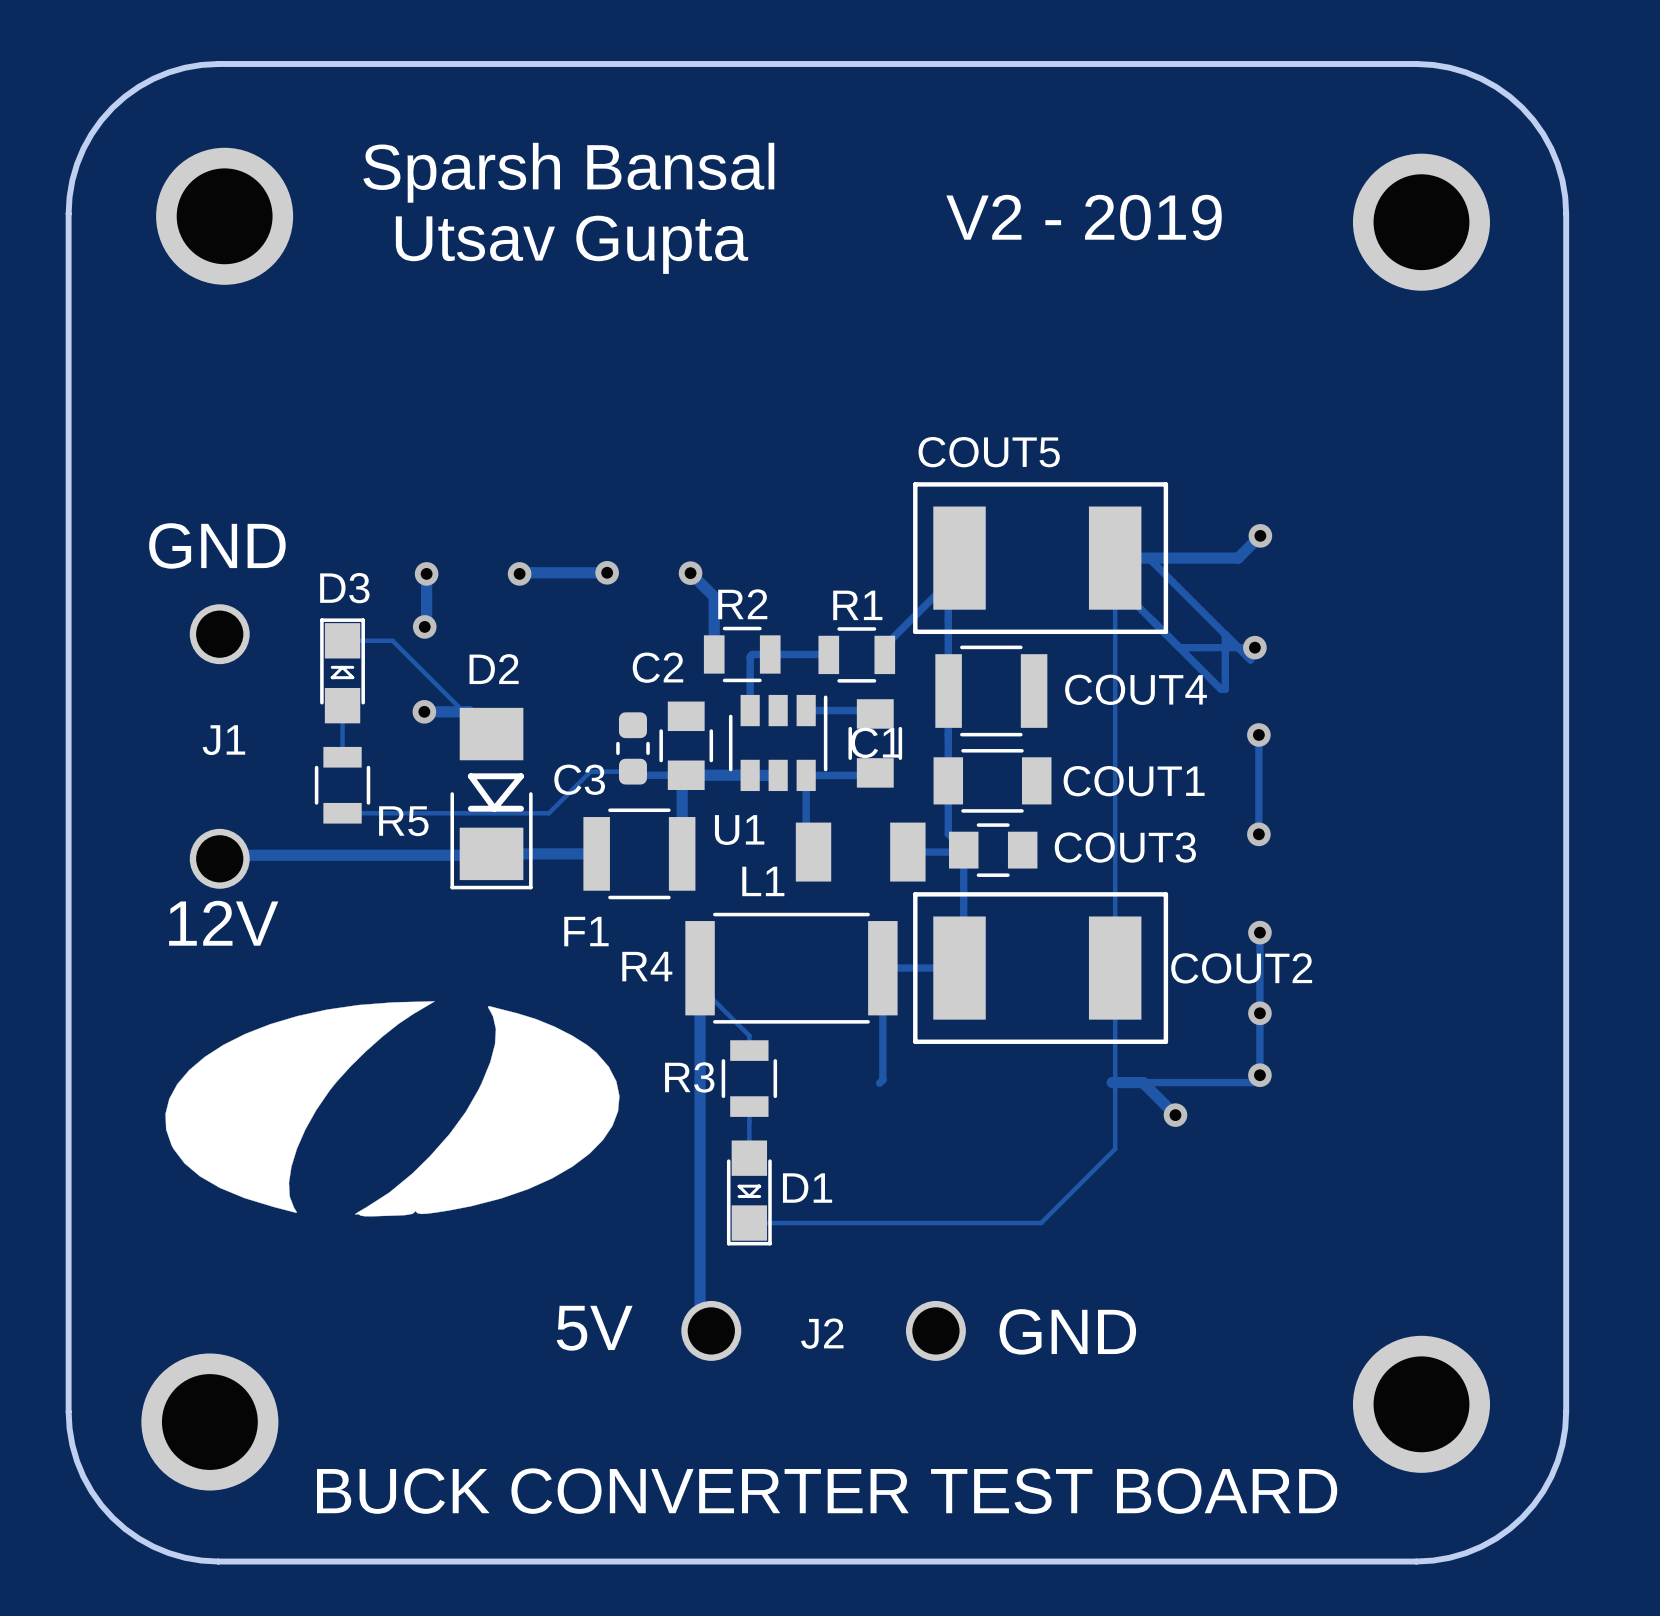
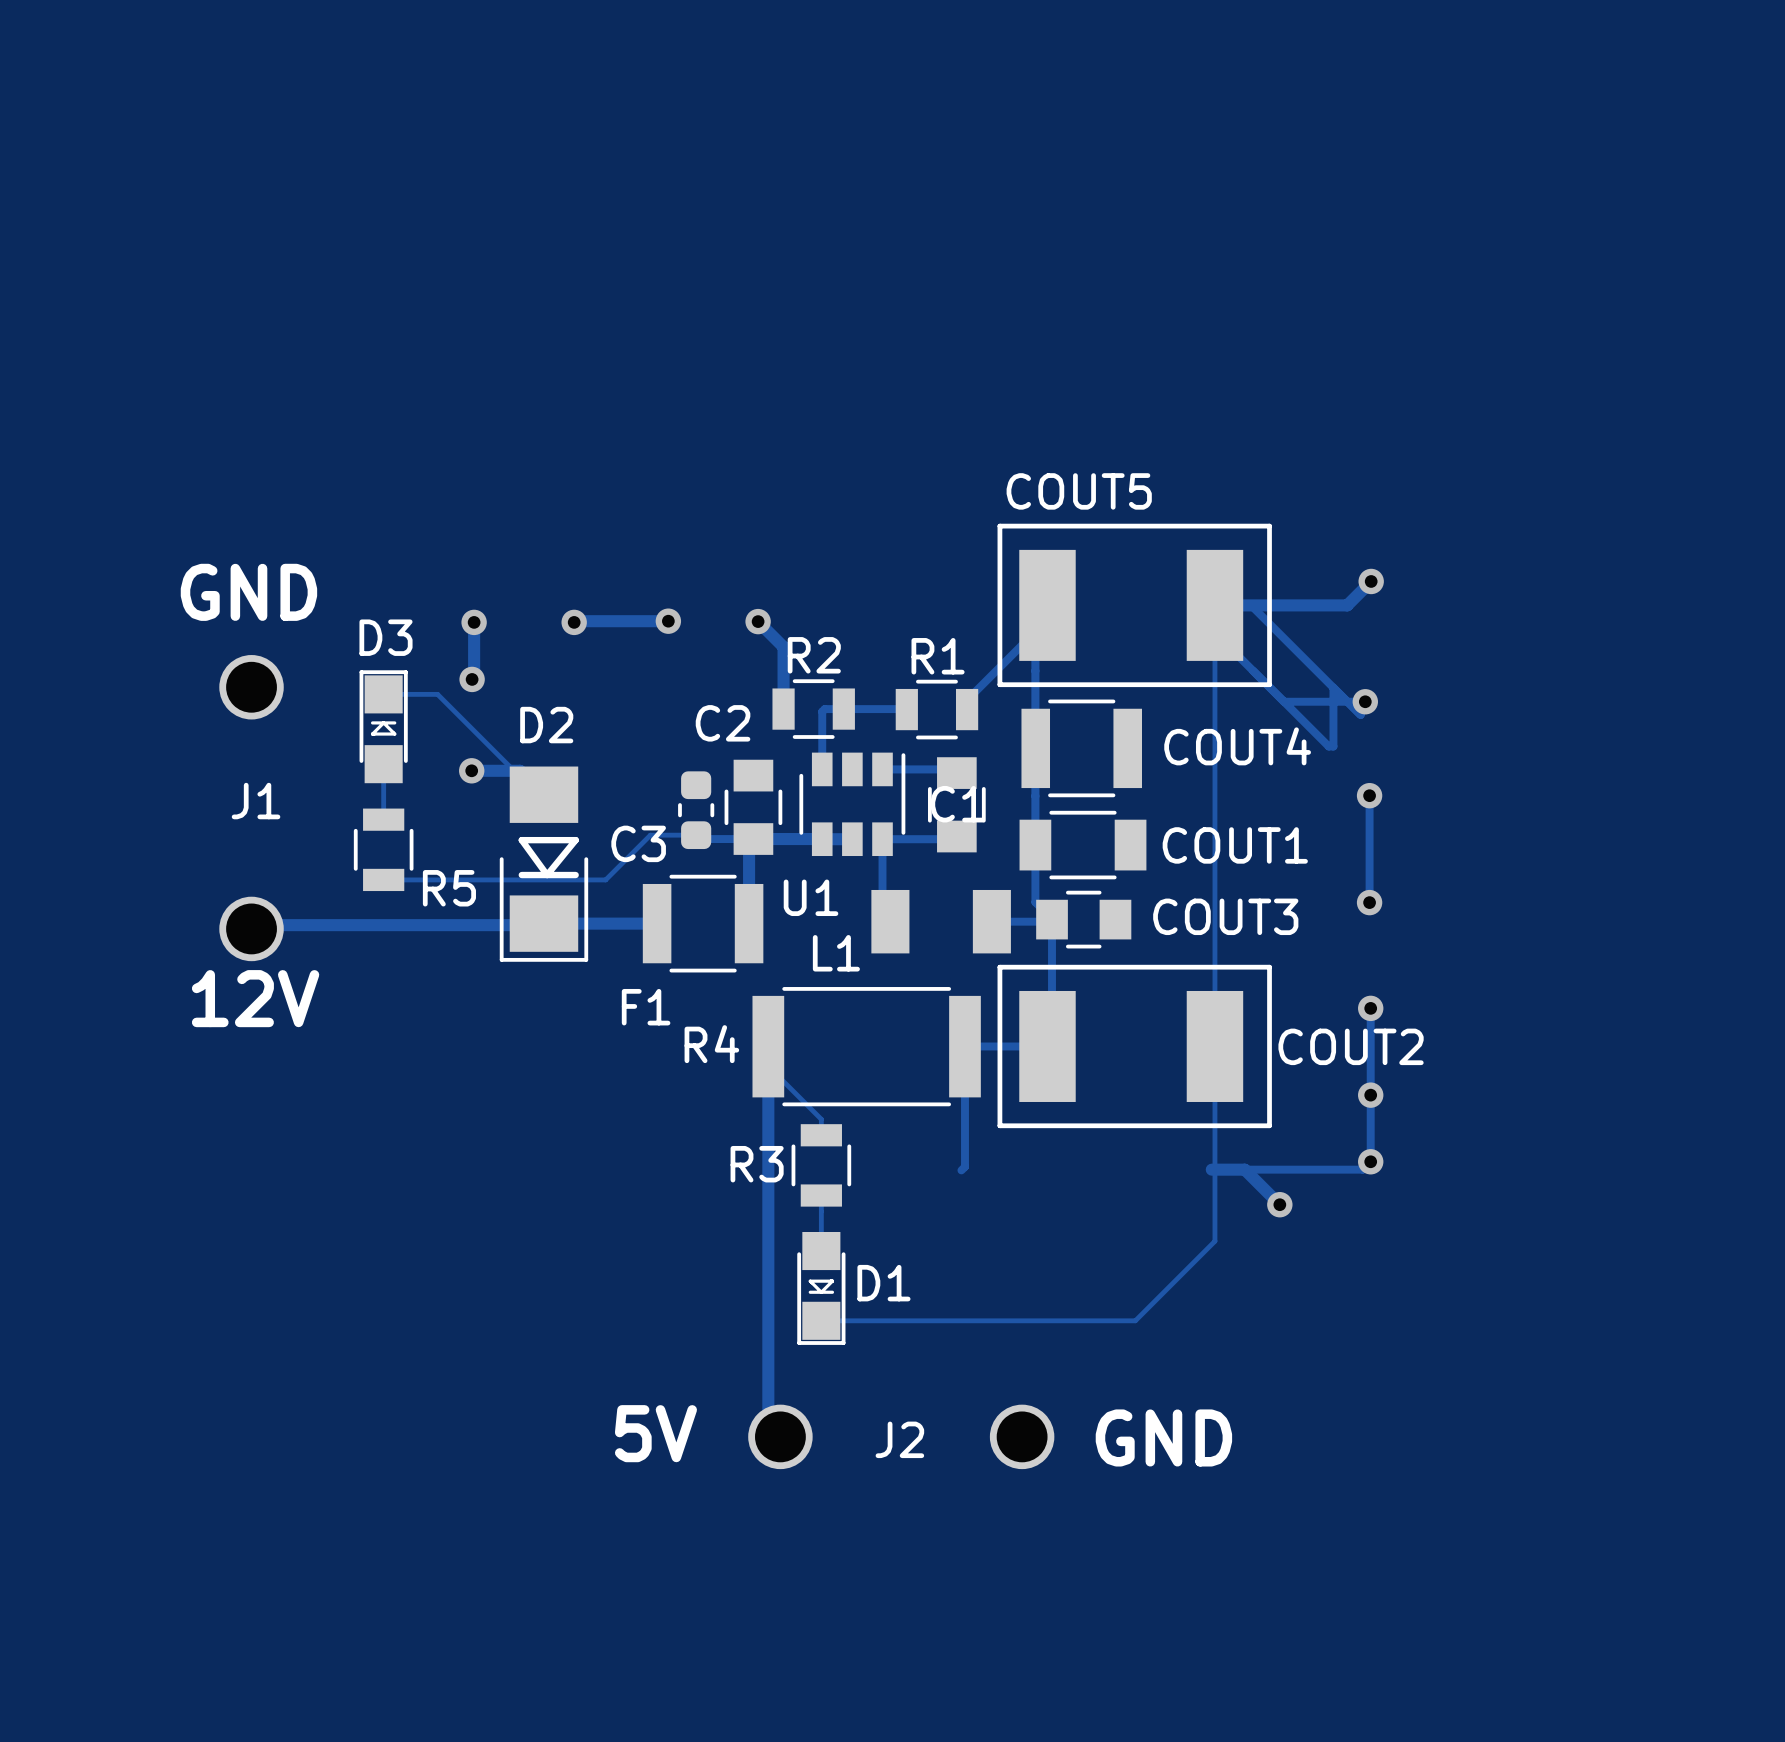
board edge: (218, 63) (1416, 63) (1449, 67) (1481, 78) (1509, 96) (1533, 120) (1543, 134) (1557, 164) (1562, 180) (1566, 213) (1566, 1411) (1562, 1445) (1551, 1476) (1533, 1505) (1509, 1528) (1481, 1546) (1465, 1553) (1449, 1557) (1416, 1561) (218, 1561) (185, 1557) (153, 1546) (125, 1528) (101, 1505) (83, 1476) (77, 1461) (69, 1428) (68, 1411) (69, 196) (77, 164) (83, 148) (101, 120) (112, 107) (138, 86) (168, 72) (185, 67) (218, 63) -> none
text: Sparsh Bansal (568, 172) -> none
part: (224, 216) -> none
text: V2 - 2019 (1084, 217) -> none
part: (1421, 222) -> none
text: Utsav Gupta (572, 244) -> none
drawing: [165, 1001, 620, 1217] -> none
part: (1421, 1404) -> none
part: (209, 1422) -> none
text: BUCK CONVERTER TEST BOARD (827, 1491) -> none

